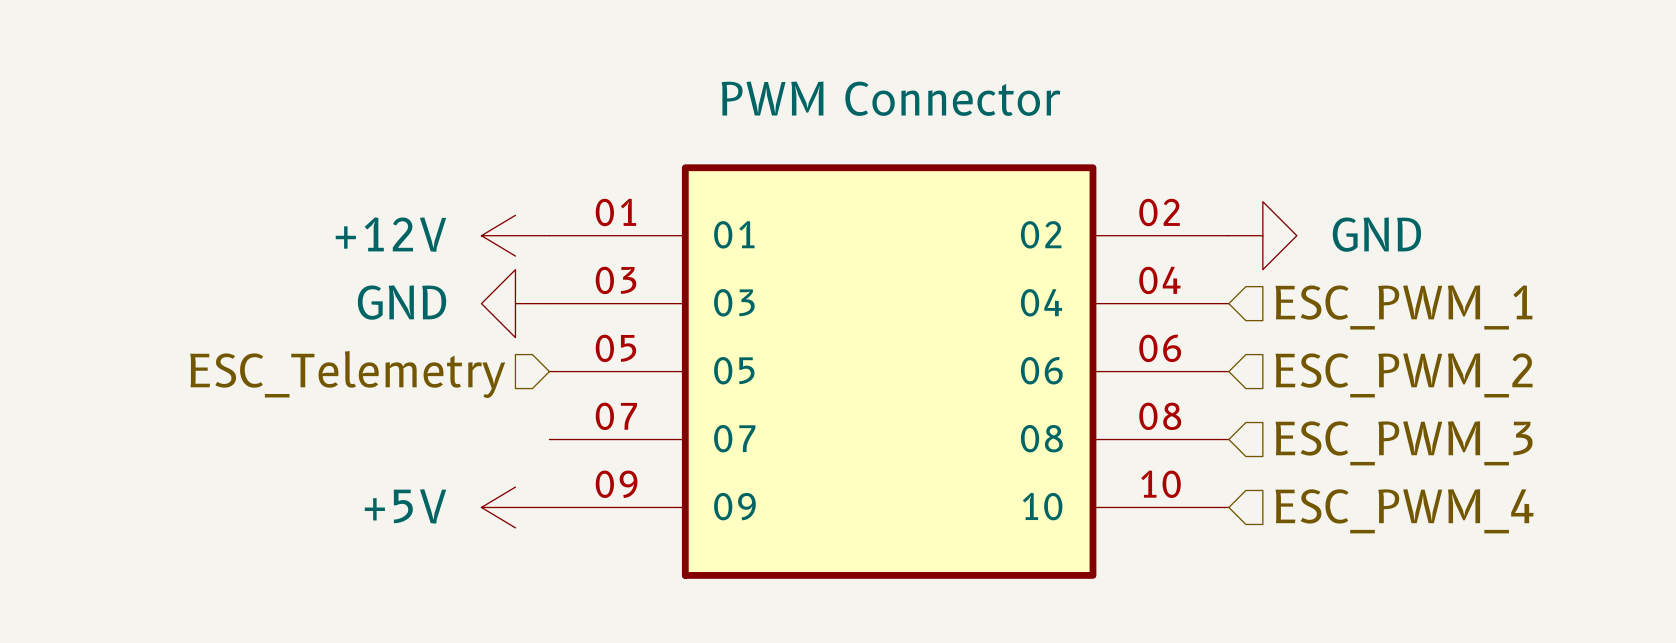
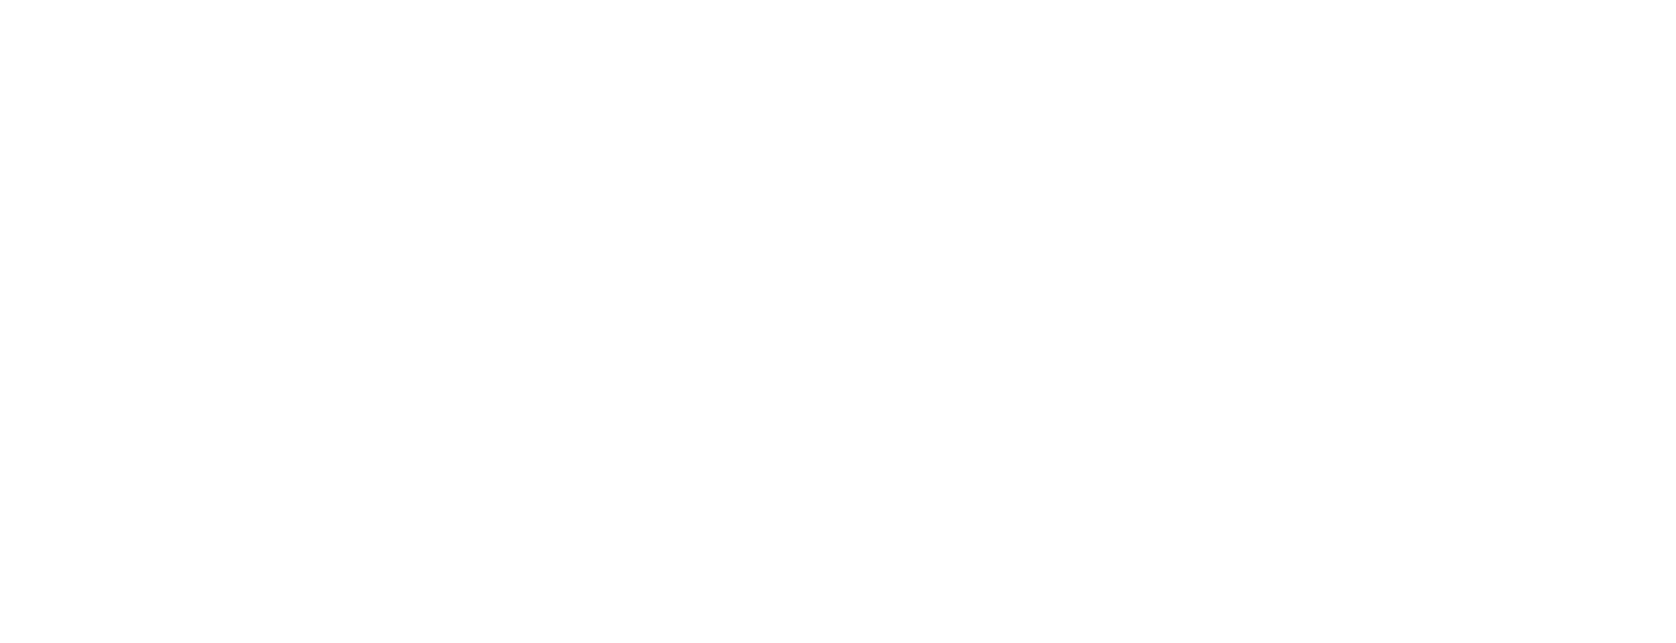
power symbol: +12V (515, 235) -> none
power symbol: GND (1262, 235) -> none
power symbol: GND (515, 303) -> none
hierarchical label: ESC_PWM_1 (1403, 307) -> none
part: PWM Connector (889, 371) -> none
hierarchical label: ESC_Telemetry (347, 374) -> none
hierarchical label: ESC_PWM_2 (1404, 375) -> none
hierarchical label: ESC_PWM_3 (1404, 443) -> none
power symbol: +5V (515, 507) -> none
hierarchical label: ESC_PWM_4 (1404, 511) -> none

